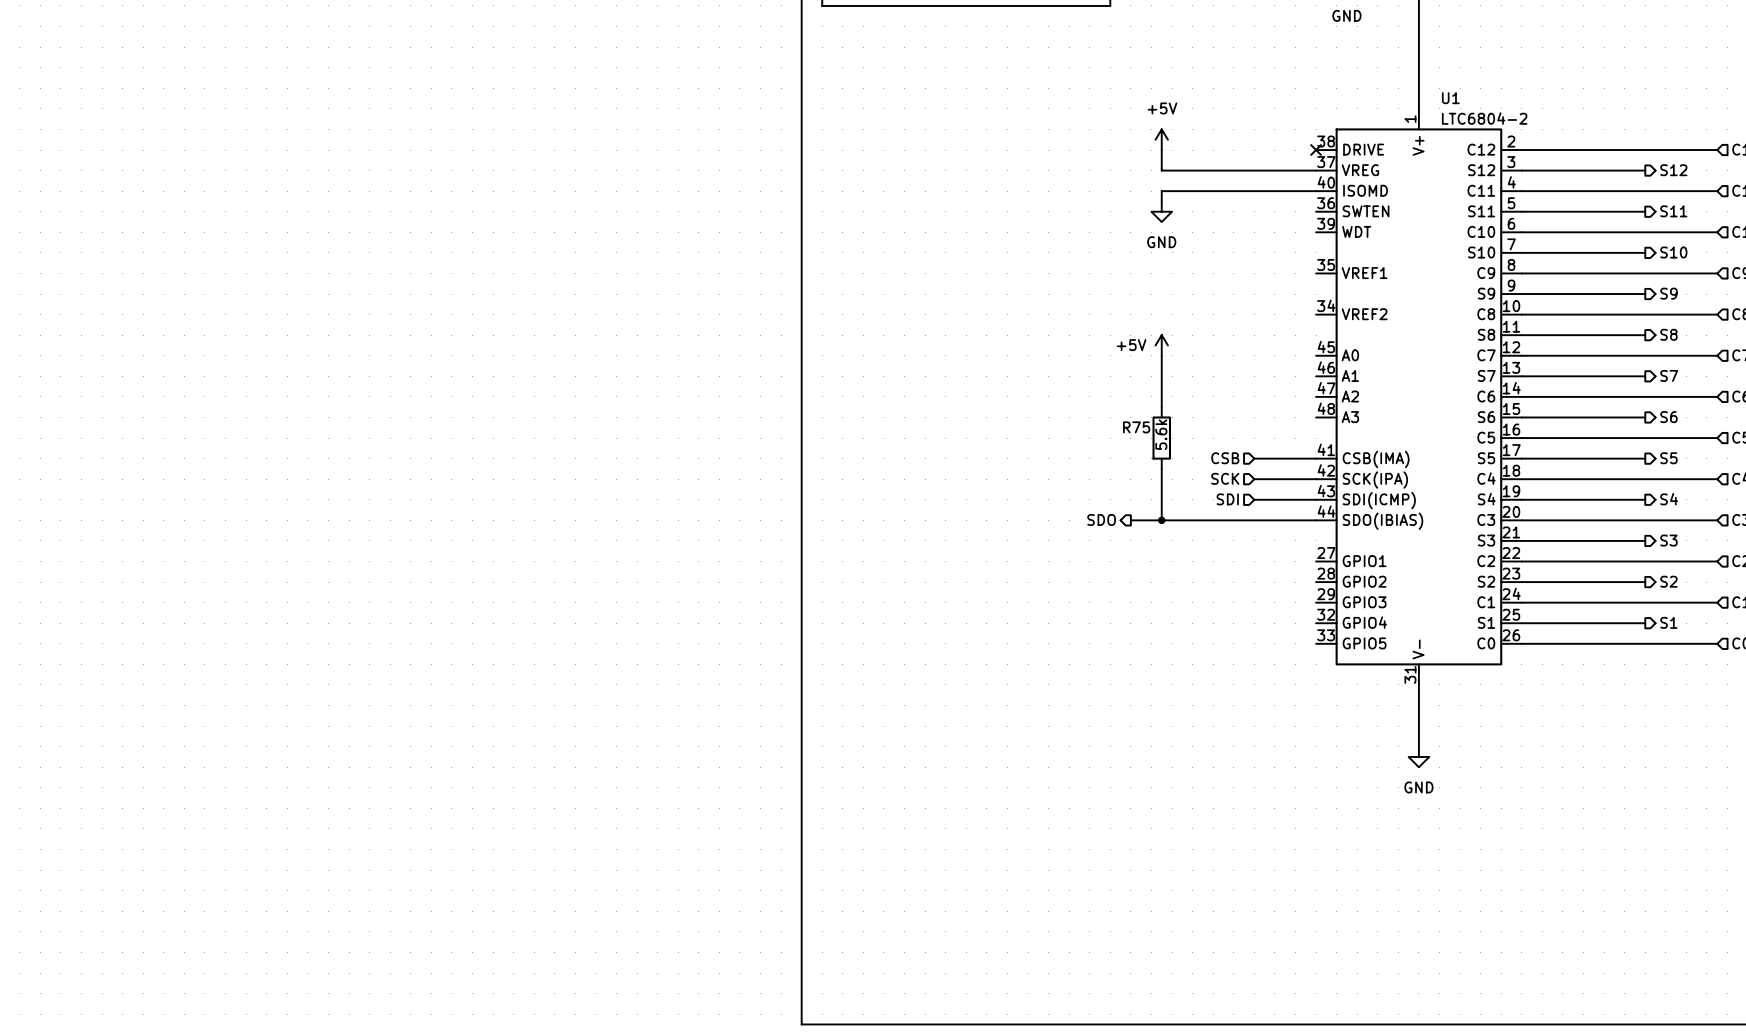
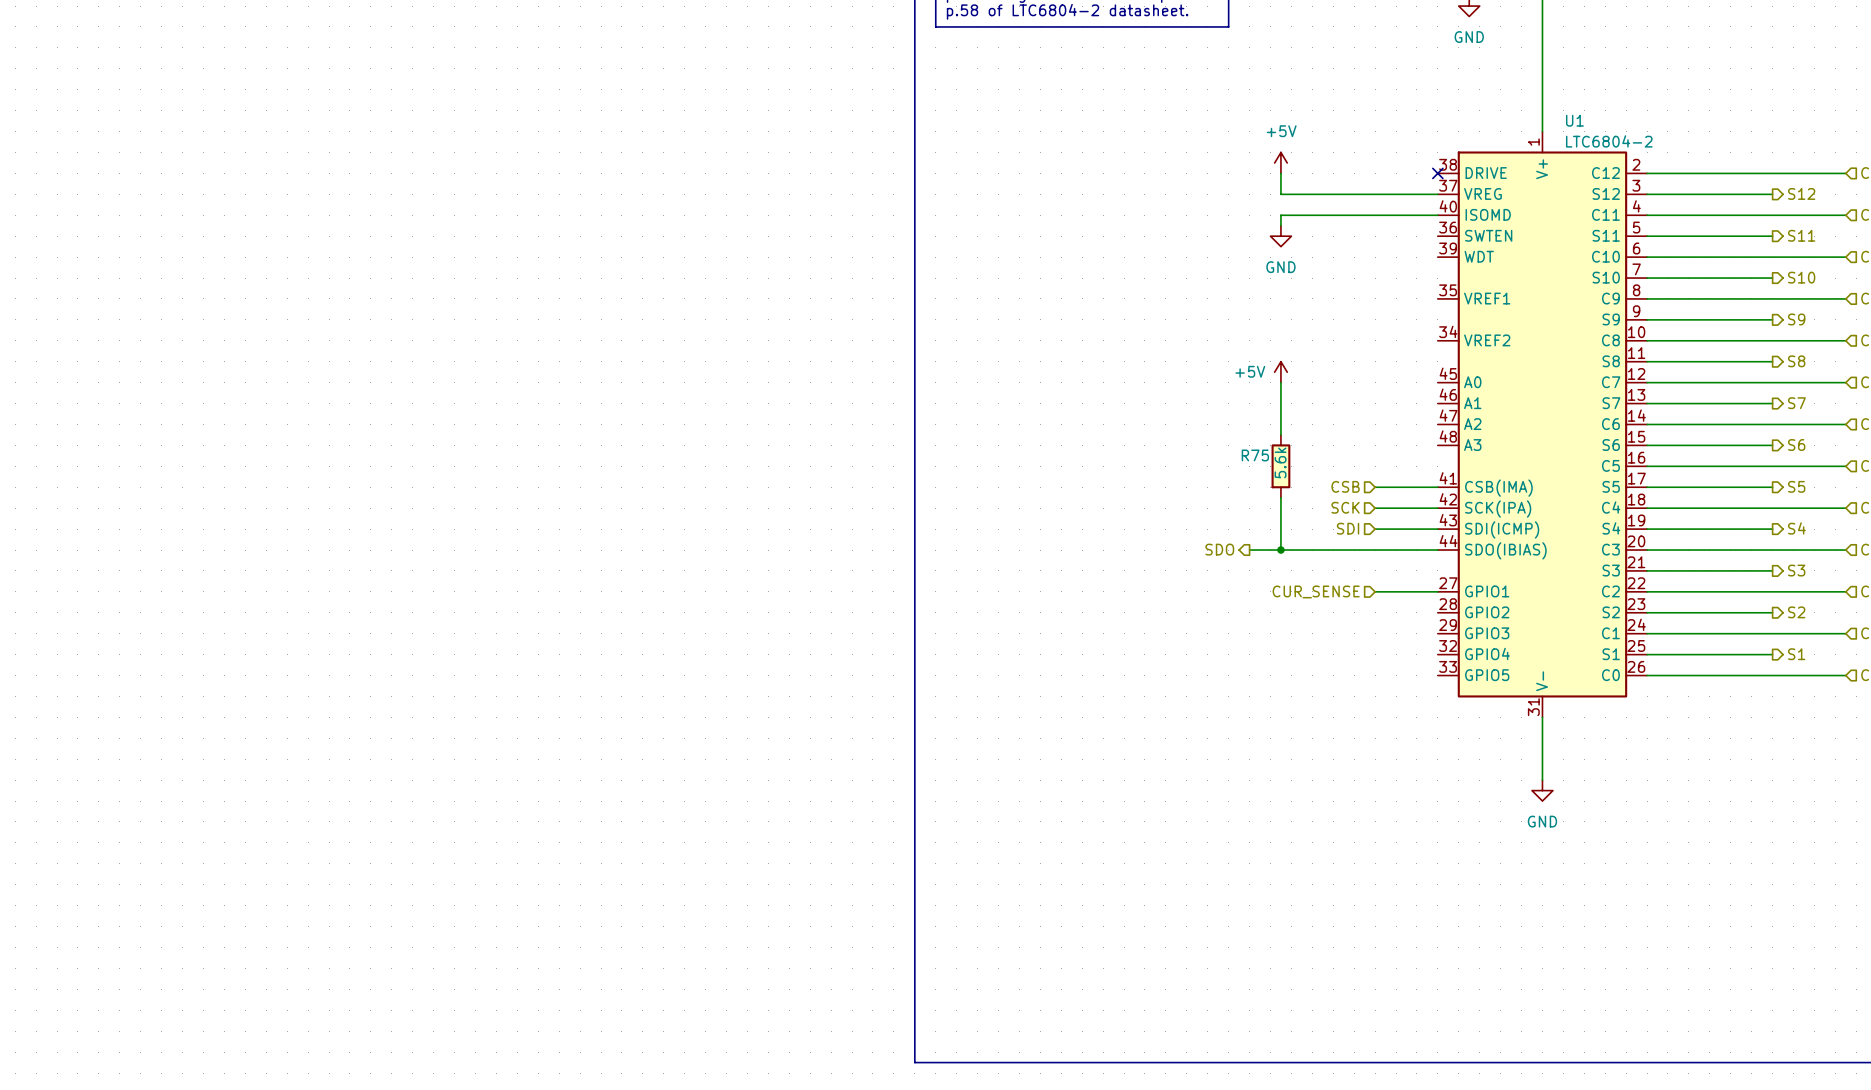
hierarchical label: none -> CUR_SENSE (1316, 591)
wire: none -> (1375, 591) (1437, 591)

